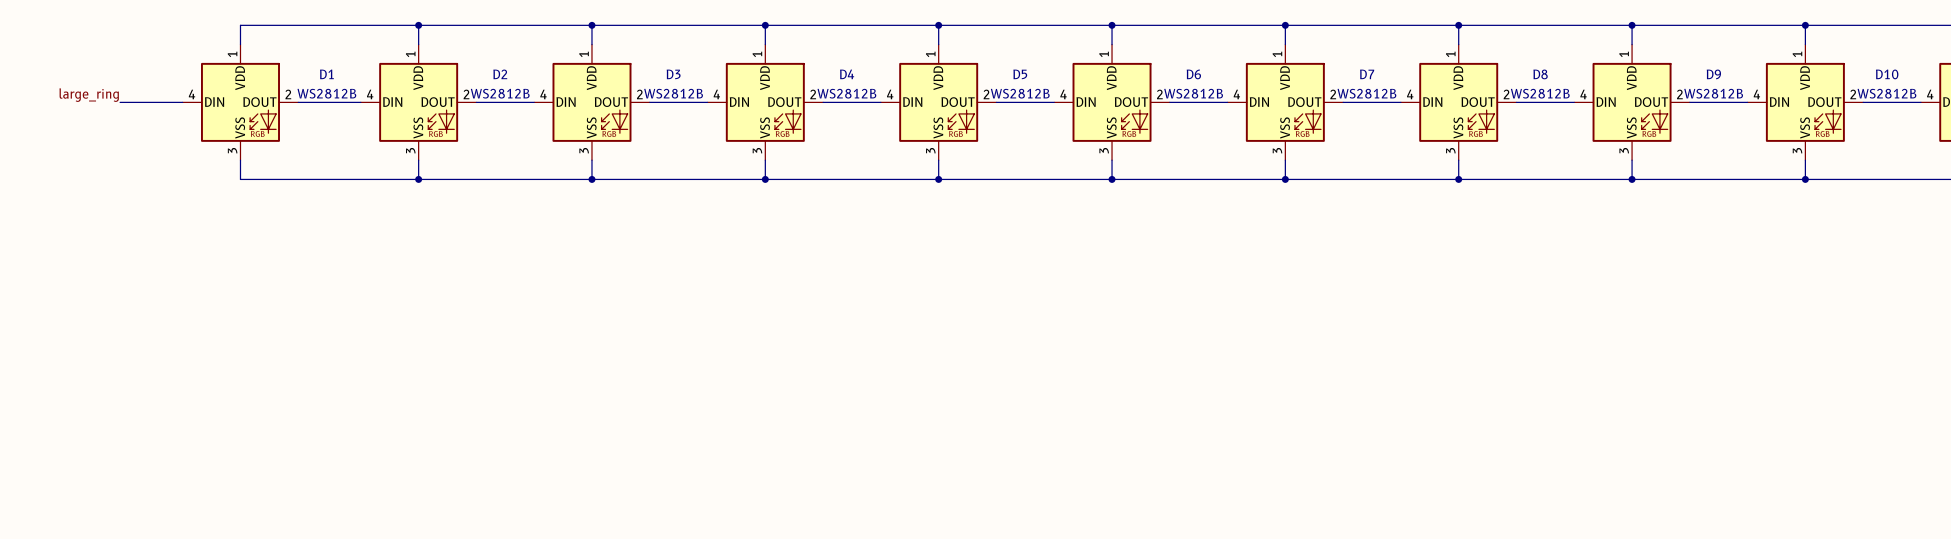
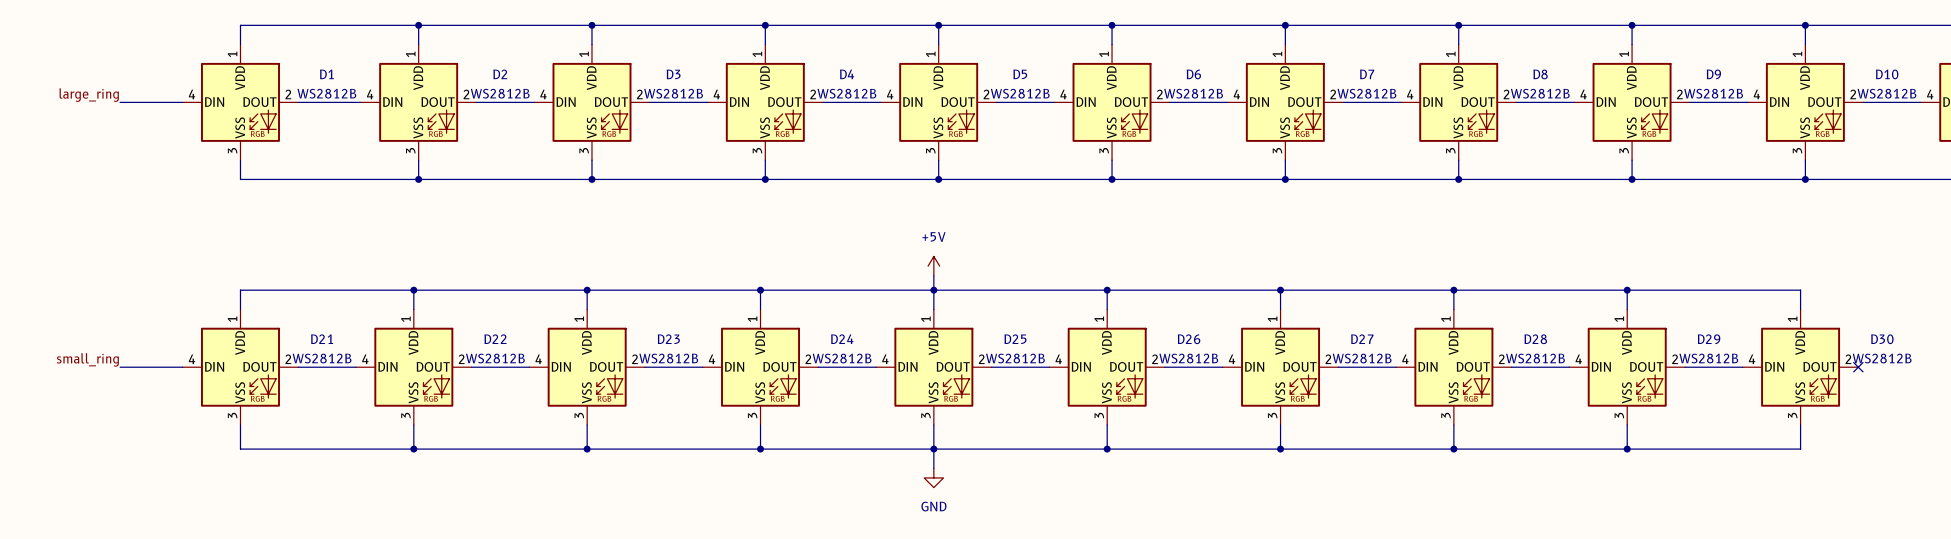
power symbol: none -> +5V (933, 266)
wire: none -> (933, 275) (933, 309)
wire: none -> (413, 290) (413, 309)
junction: none -> (413, 290)
wire: none -> (587, 290) (587, 309)
junction: none -> (587, 290)
wire: none -> (760, 290) (760, 309)
junction: none -> (760, 290)
junction: none -> (933, 290)
wire: none -> (1107, 290) (1107, 309)
junction: none -> (1107, 290)
wire: none -> (1280, 290) (1280, 309)
junction: none -> (1280, 290)
wire: none -> (1453, 290) (1453, 309)
junction: none -> (1453, 290)
wire: none -> (1627, 290) (1627, 309)
junction: none -> (1627, 290)
wire: none -> (240, 309) (240, 290) (1800, 290) (1800, 309)
label: none -> small_ring (87, 359)
wire: none -> (120, 367) (182, 367)
D21: none -> WS2812B (240, 367)
wire: none -> (298, 367) (356, 367)
D22: none -> WS2812B (413, 367)
wire: none -> (471, 367) (529, 367)
D23: none -> WS2812B (587, 367)
wire: none -> (644, 367) (702, 367)
D24: none -> WS2812B (760, 367)
wire: none -> (818, 367) (876, 367)
D25: none -> WS2812B (933, 367)
wire: none -> (991, 367) (1049, 367)
D26: none -> WS2812B (1107, 367)
wire: none -> (1164, 367) (1222, 367)
D27: none -> WS2812B (1280, 367)
wire: none -> (1338, 367) (1396, 367)
D28: none -> WS2812B (1453, 367)
wire: none -> (1511, 367) (1569, 367)
D29: none -> WS2812B (1627, 367)
wire: none -> (1685, 367) (1742, 367)
D30: none -> WS2812B (1800, 367)
no-connect mark: none -> (1858, 367)
wire: none -> (240, 425) (240, 449) (1800, 449) (1800, 425)
wire: none -> (413, 425) (413, 449)
wire: none -> (587, 425) (587, 449)
wire: none -> (760, 425) (760, 449)
wire: none -> (933, 425) (933, 468)
wire: none -> (1107, 425) (1107, 449)
wire: none -> (1280, 425) (1280, 449)
wire: none -> (1453, 425) (1453, 449)
wire: none -> (1627, 425) (1627, 449)
junction: none -> (413, 449)
junction: none -> (587, 449)
junction: none -> (760, 449)
junction: none -> (933, 449)
junction: none -> (1107, 449)
junction: none -> (1280, 449)
junction: none -> (1453, 449)
junction: none -> (1627, 449)
power symbol: none -> GND (933, 477)

